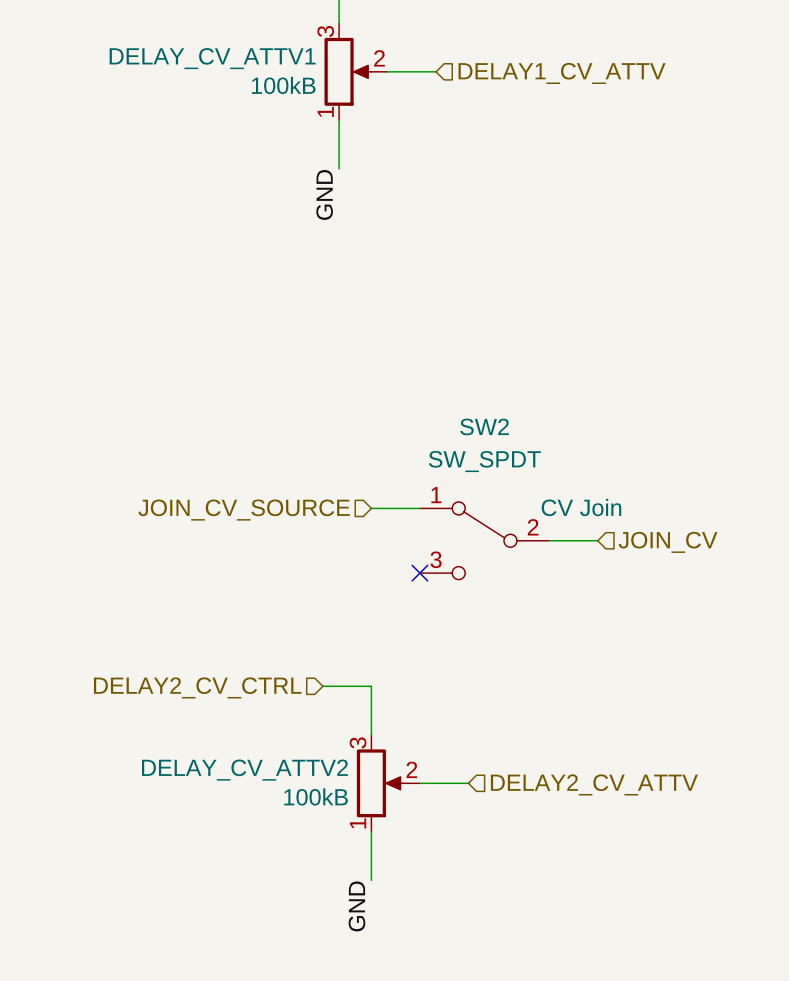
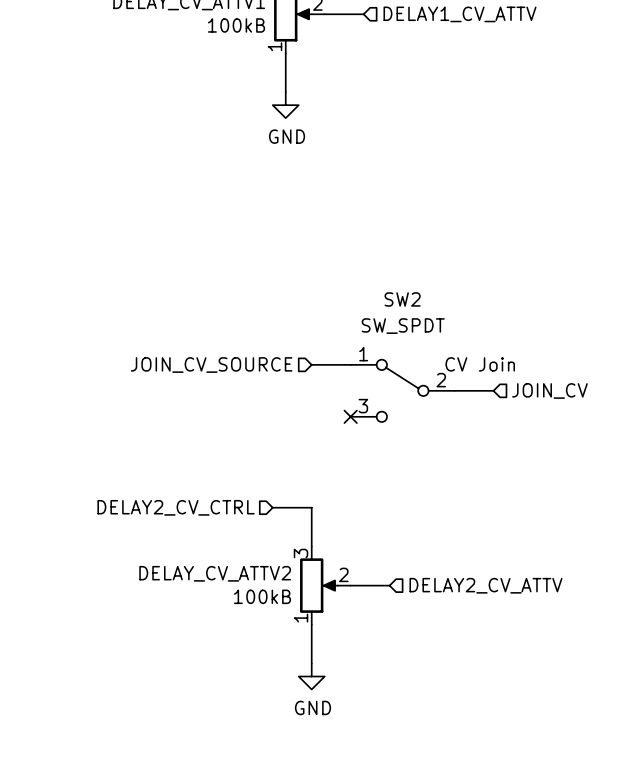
power symbol: none -> GND (285, 105)
label: GND (324, 194) -> none
power symbol: none -> GND (311, 676)
label: GND (356, 906) -> none

